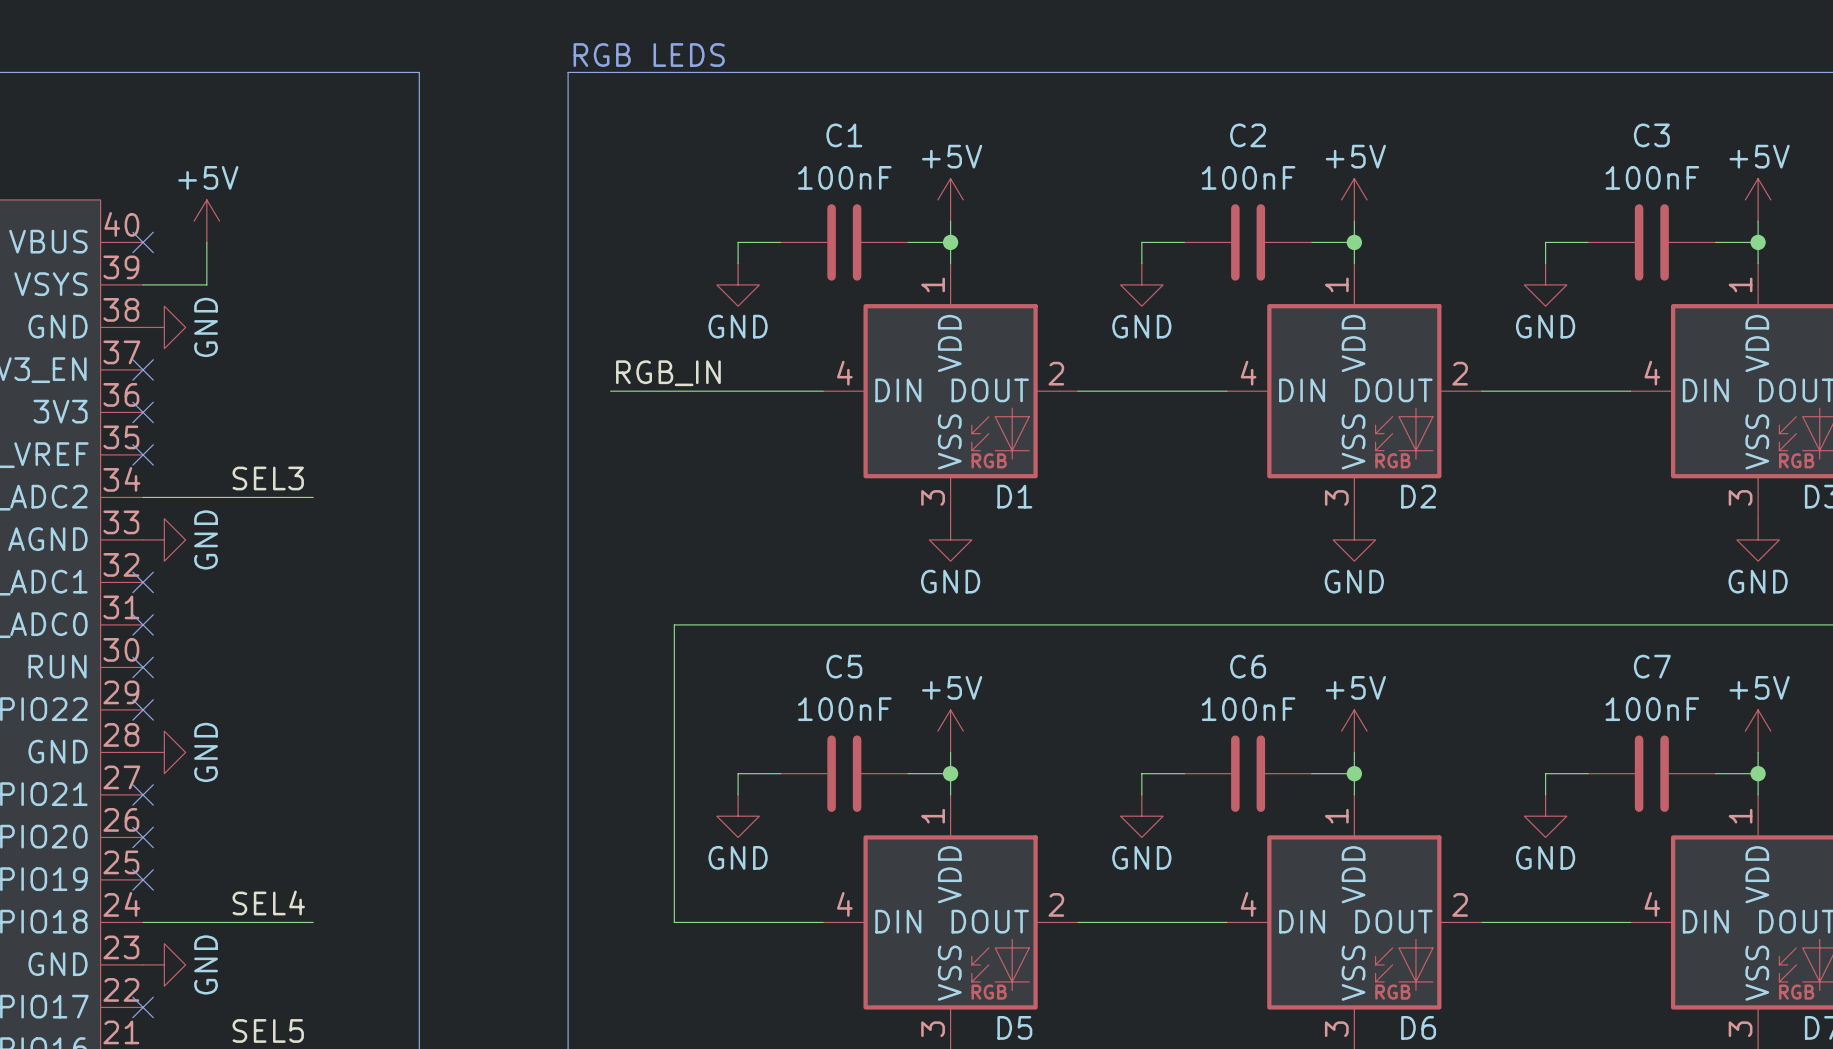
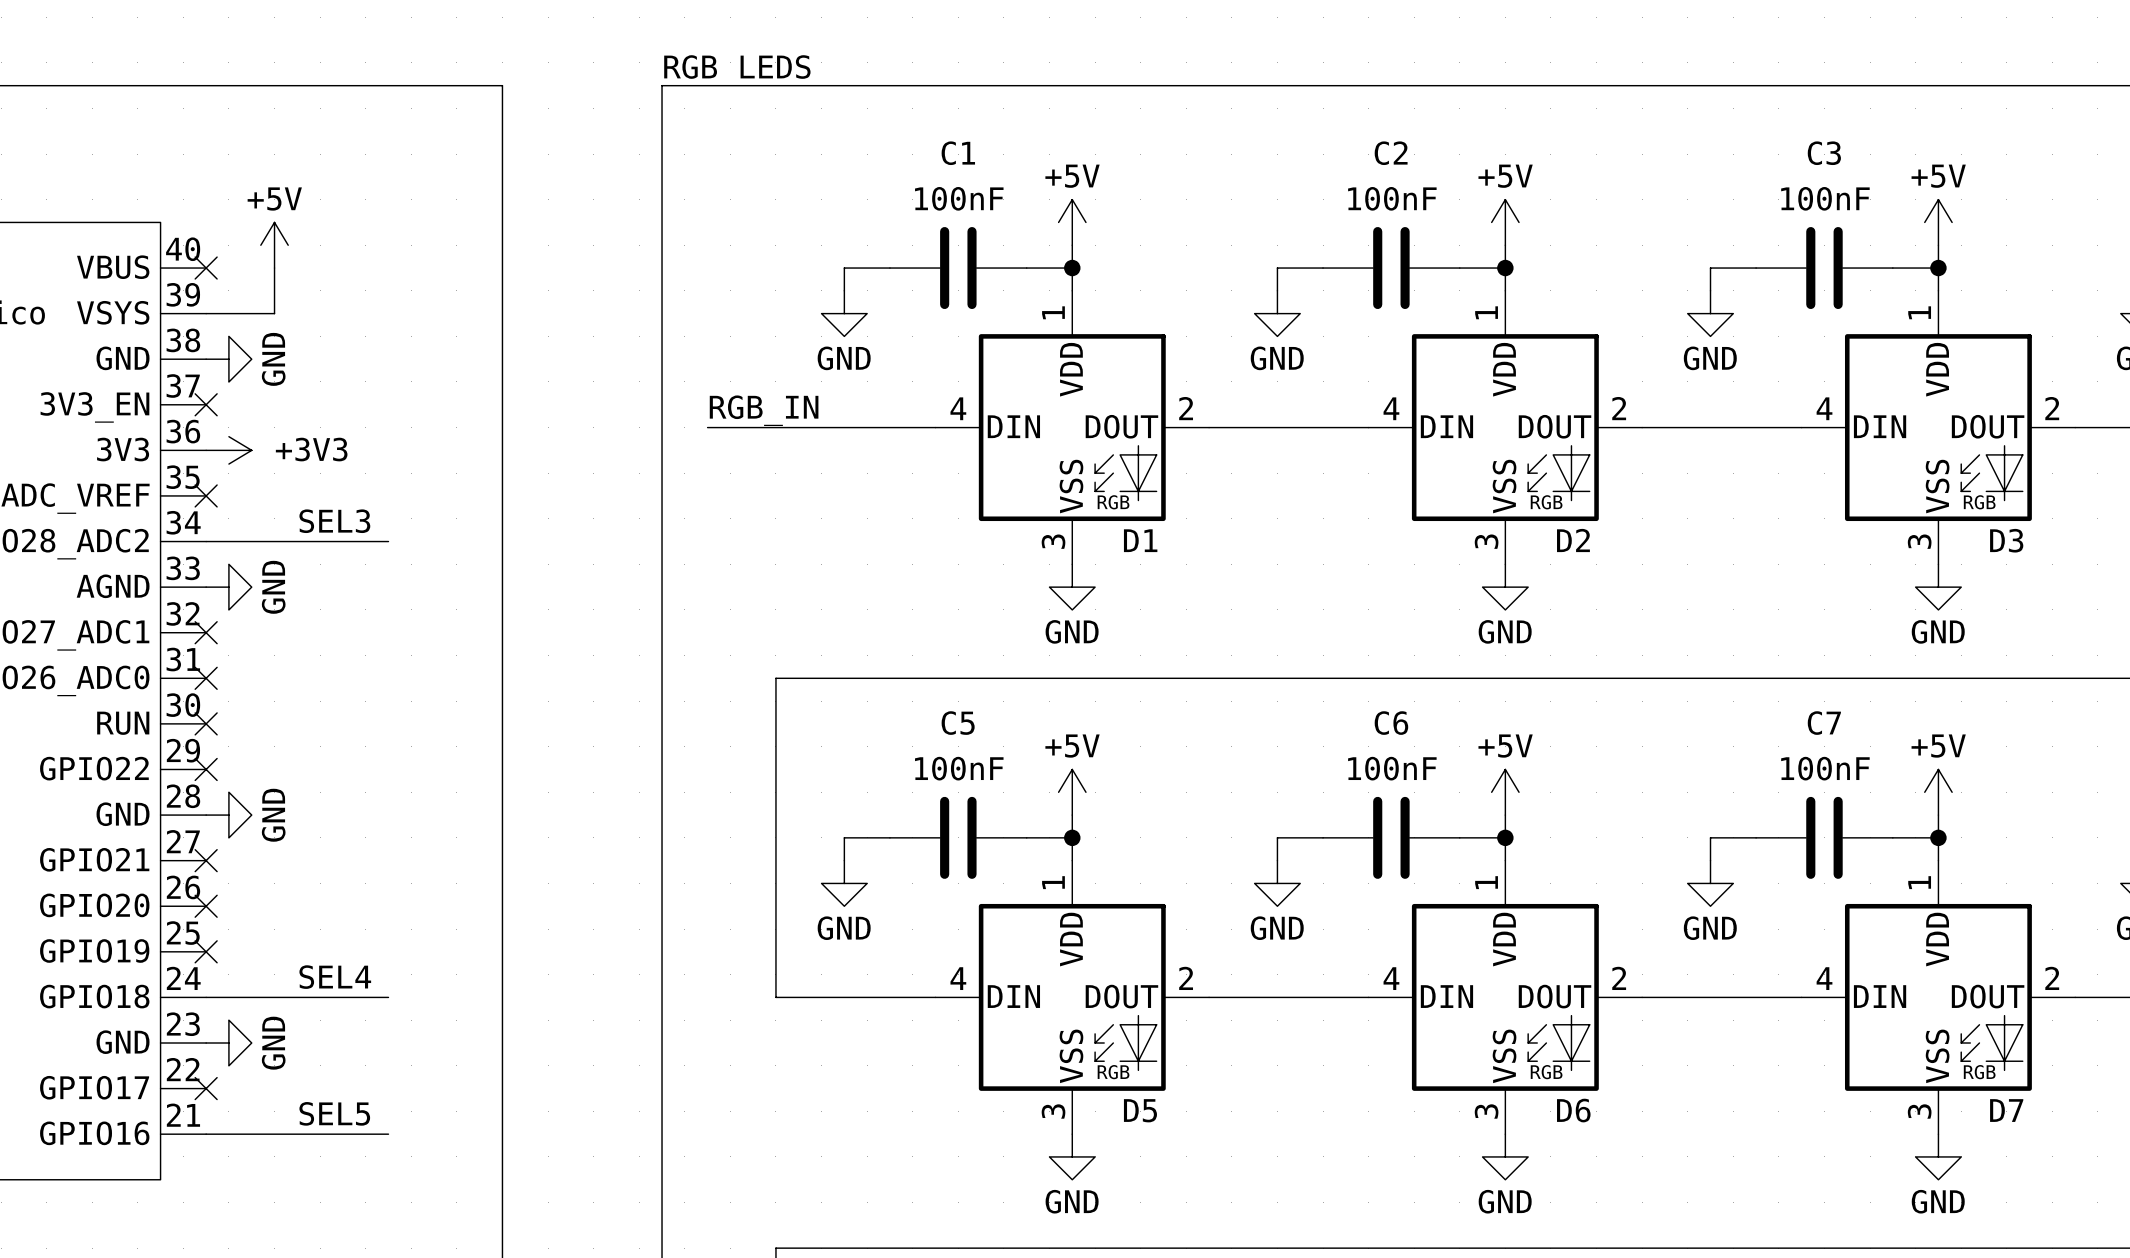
no-connect mark: (143, 412) -> none
power symbol: none -> +3V3 (228, 450)

